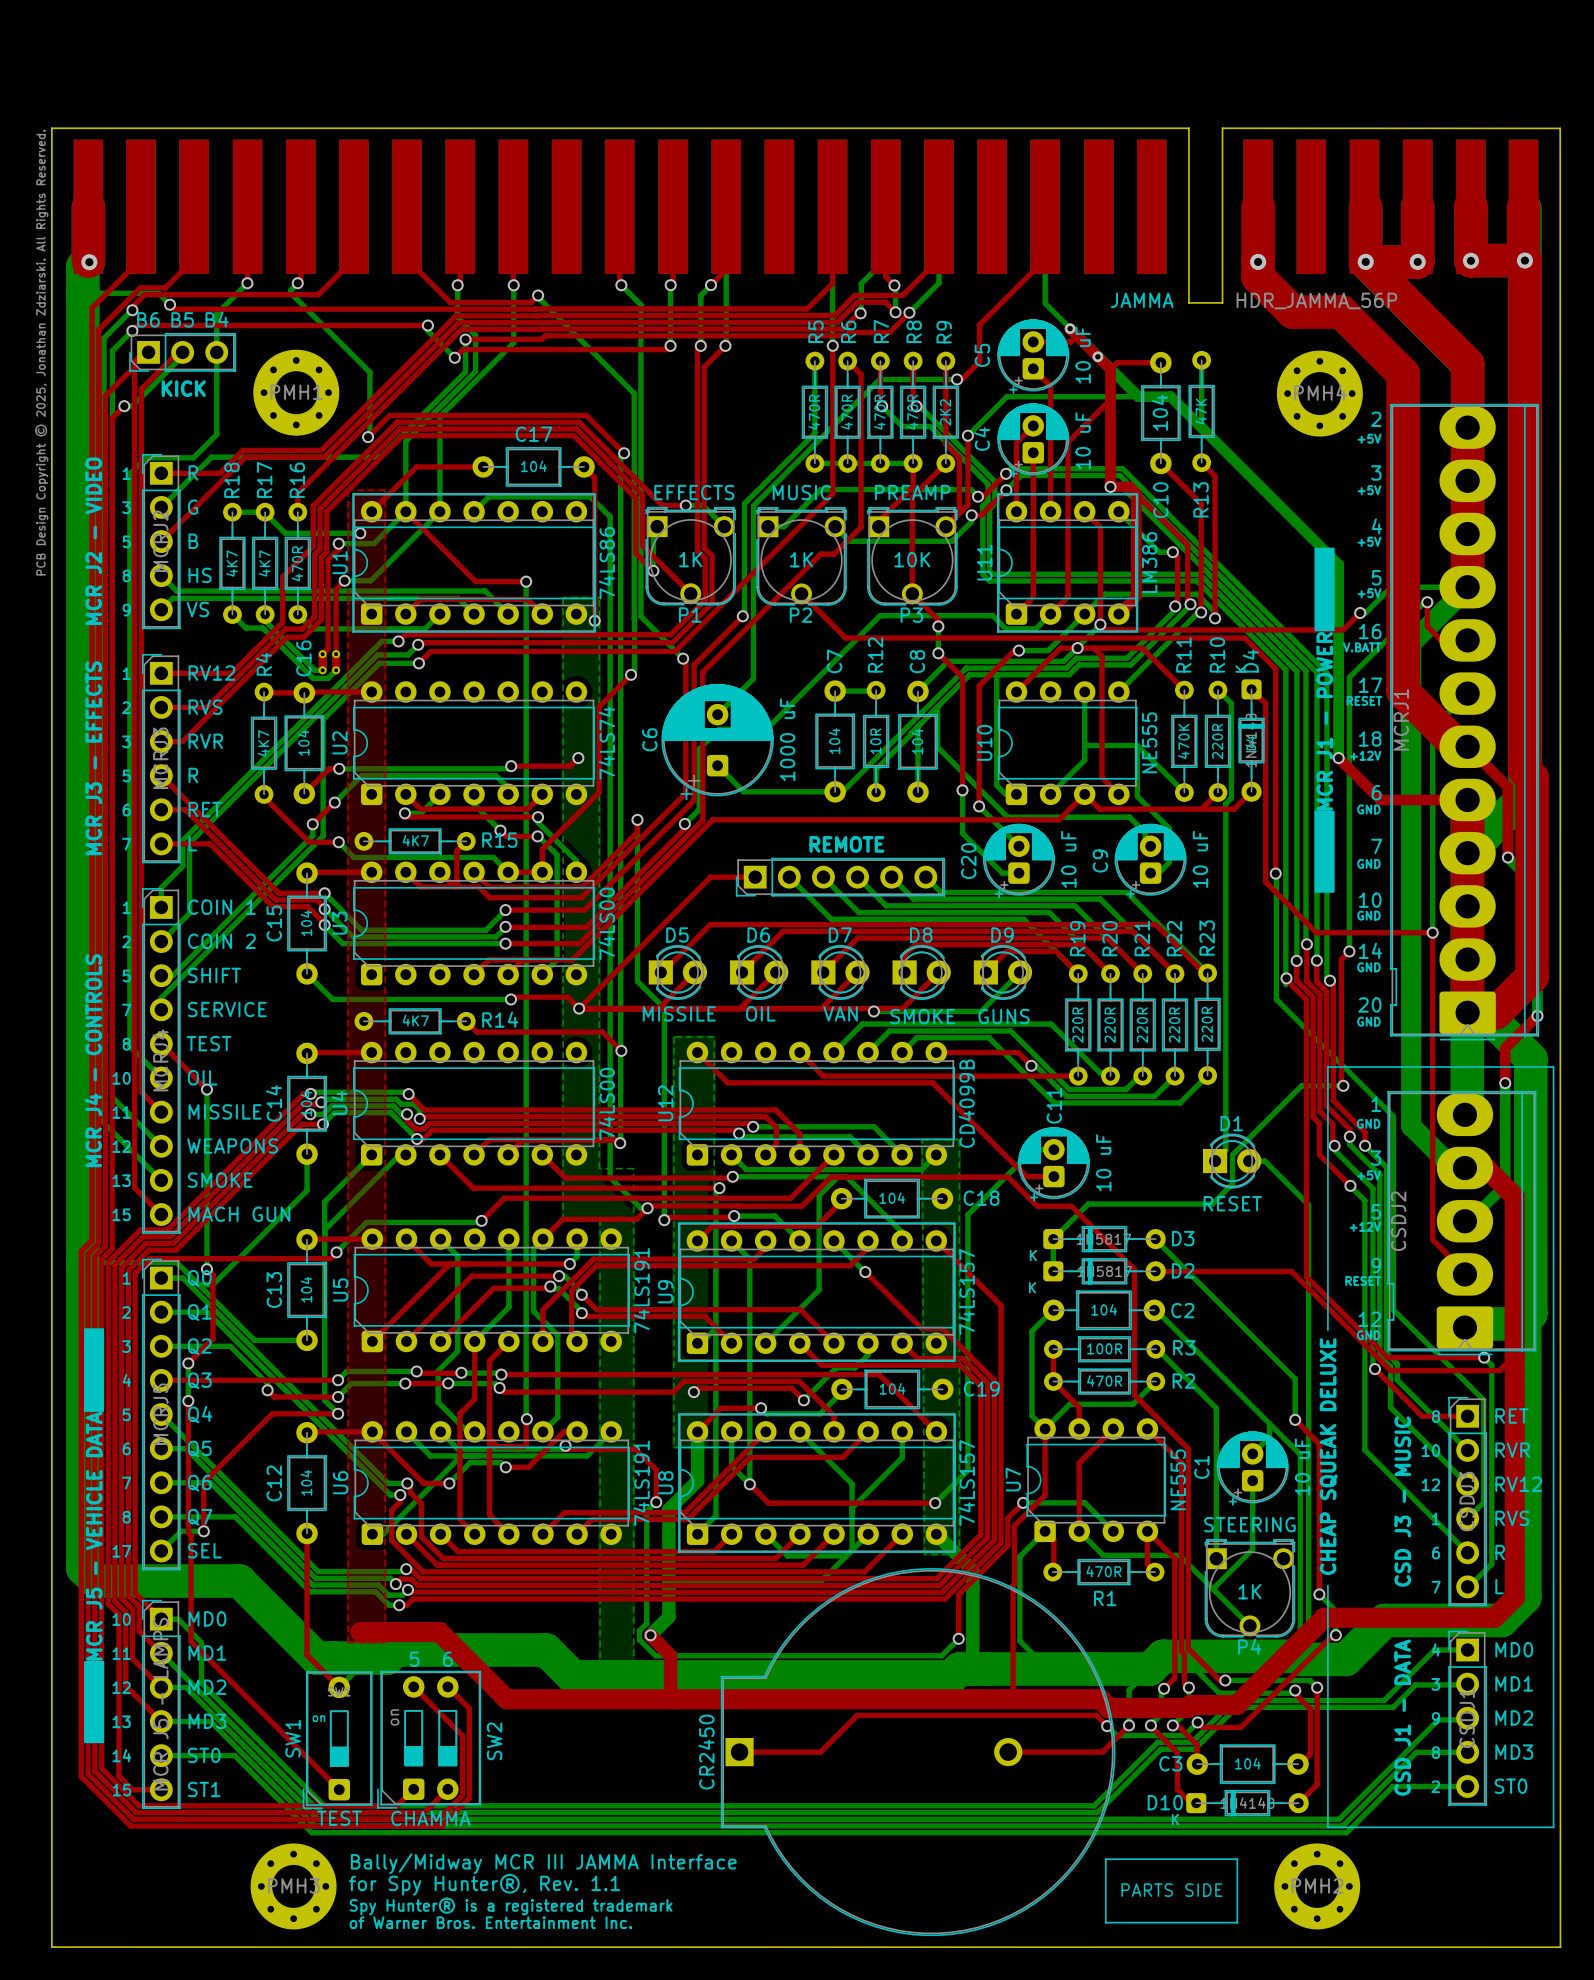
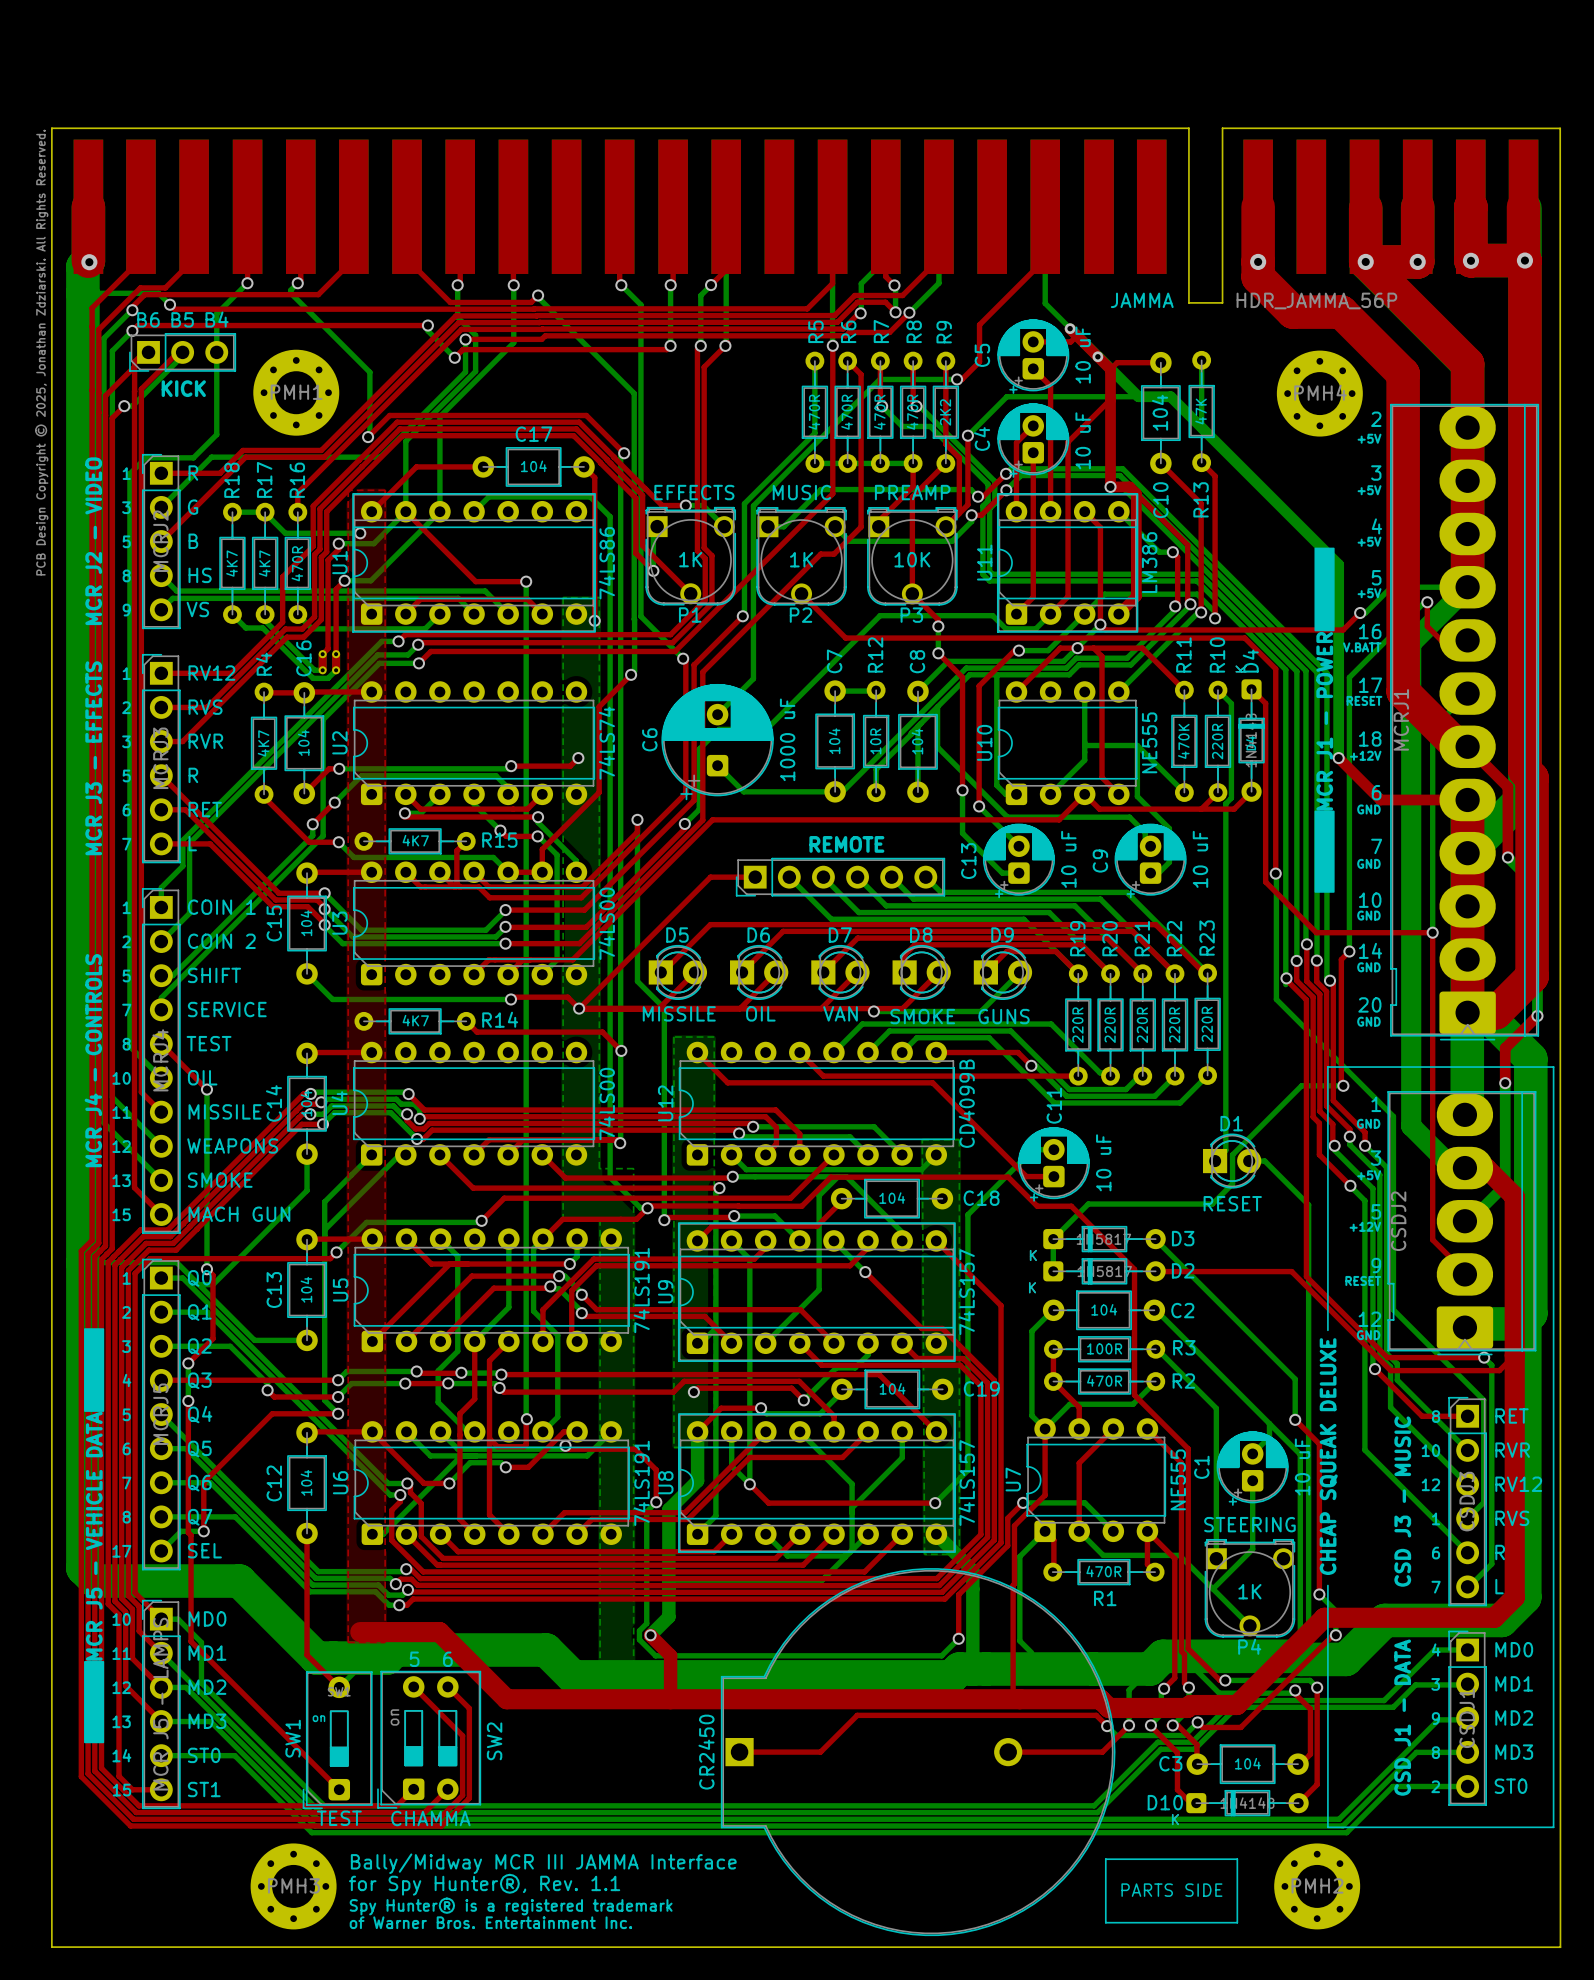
C20 name: C20 (968, 861) -> C13 (968, 861)

